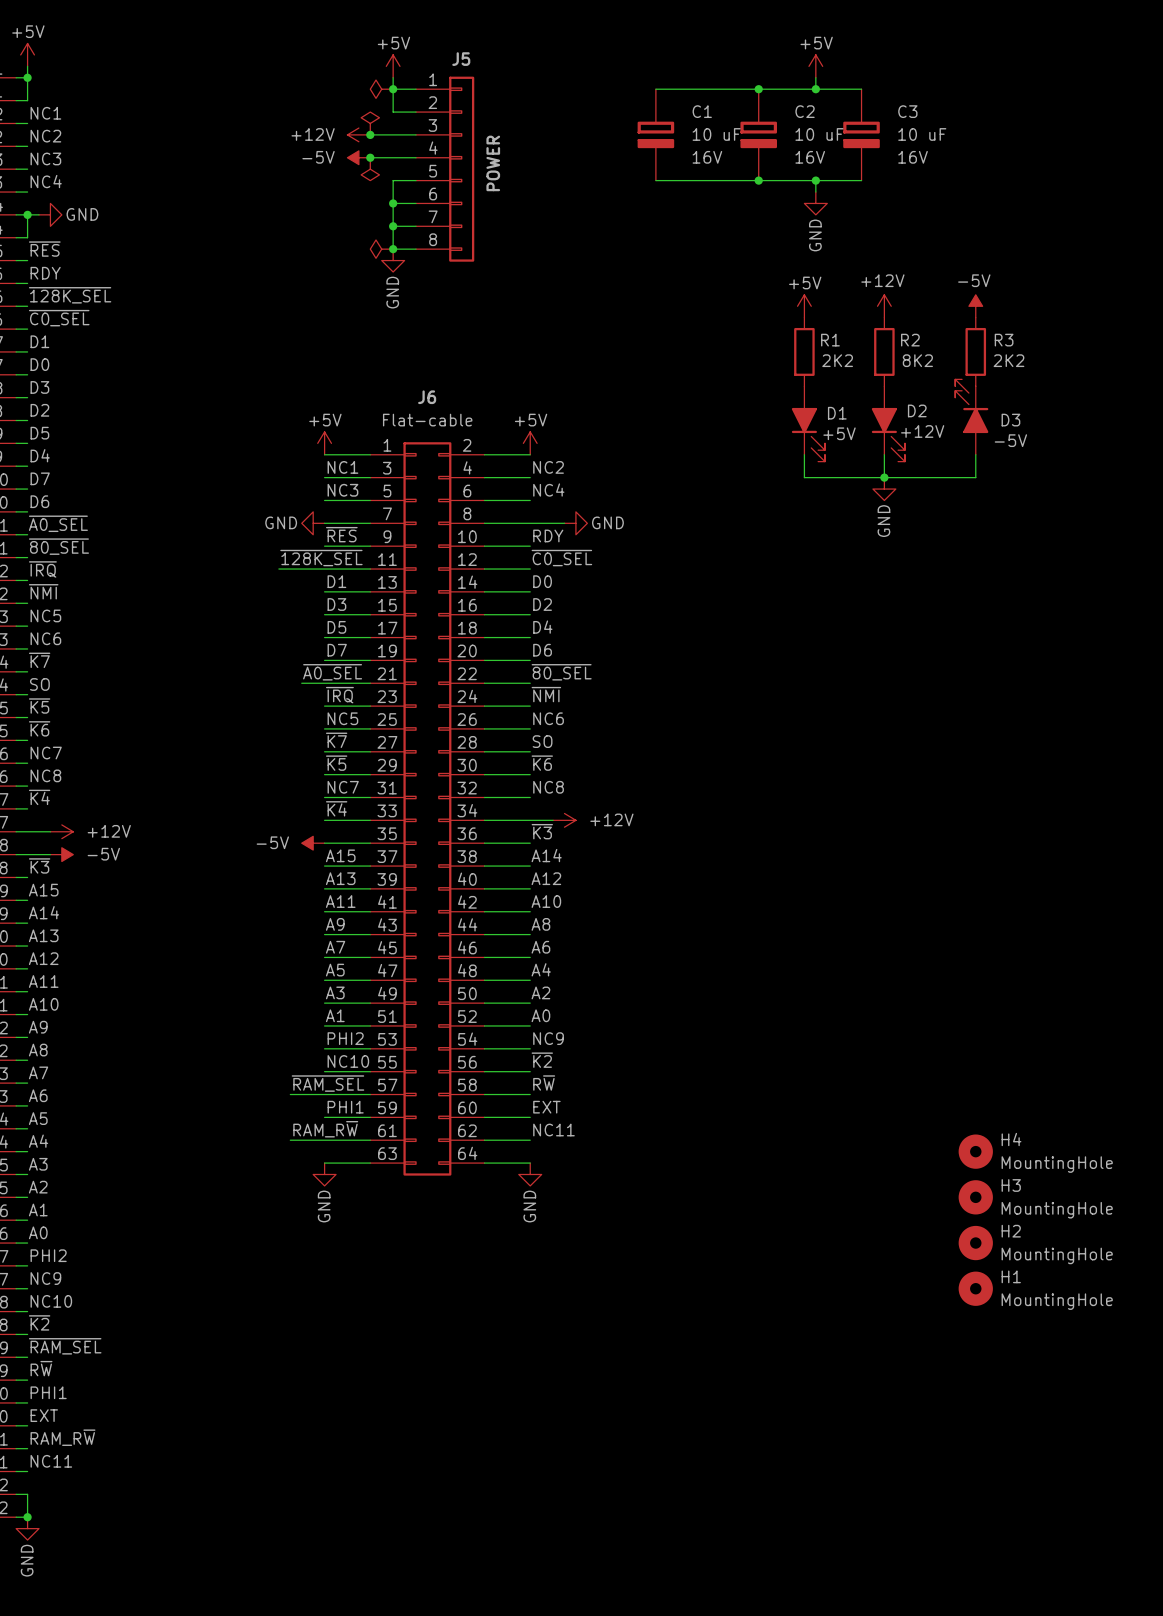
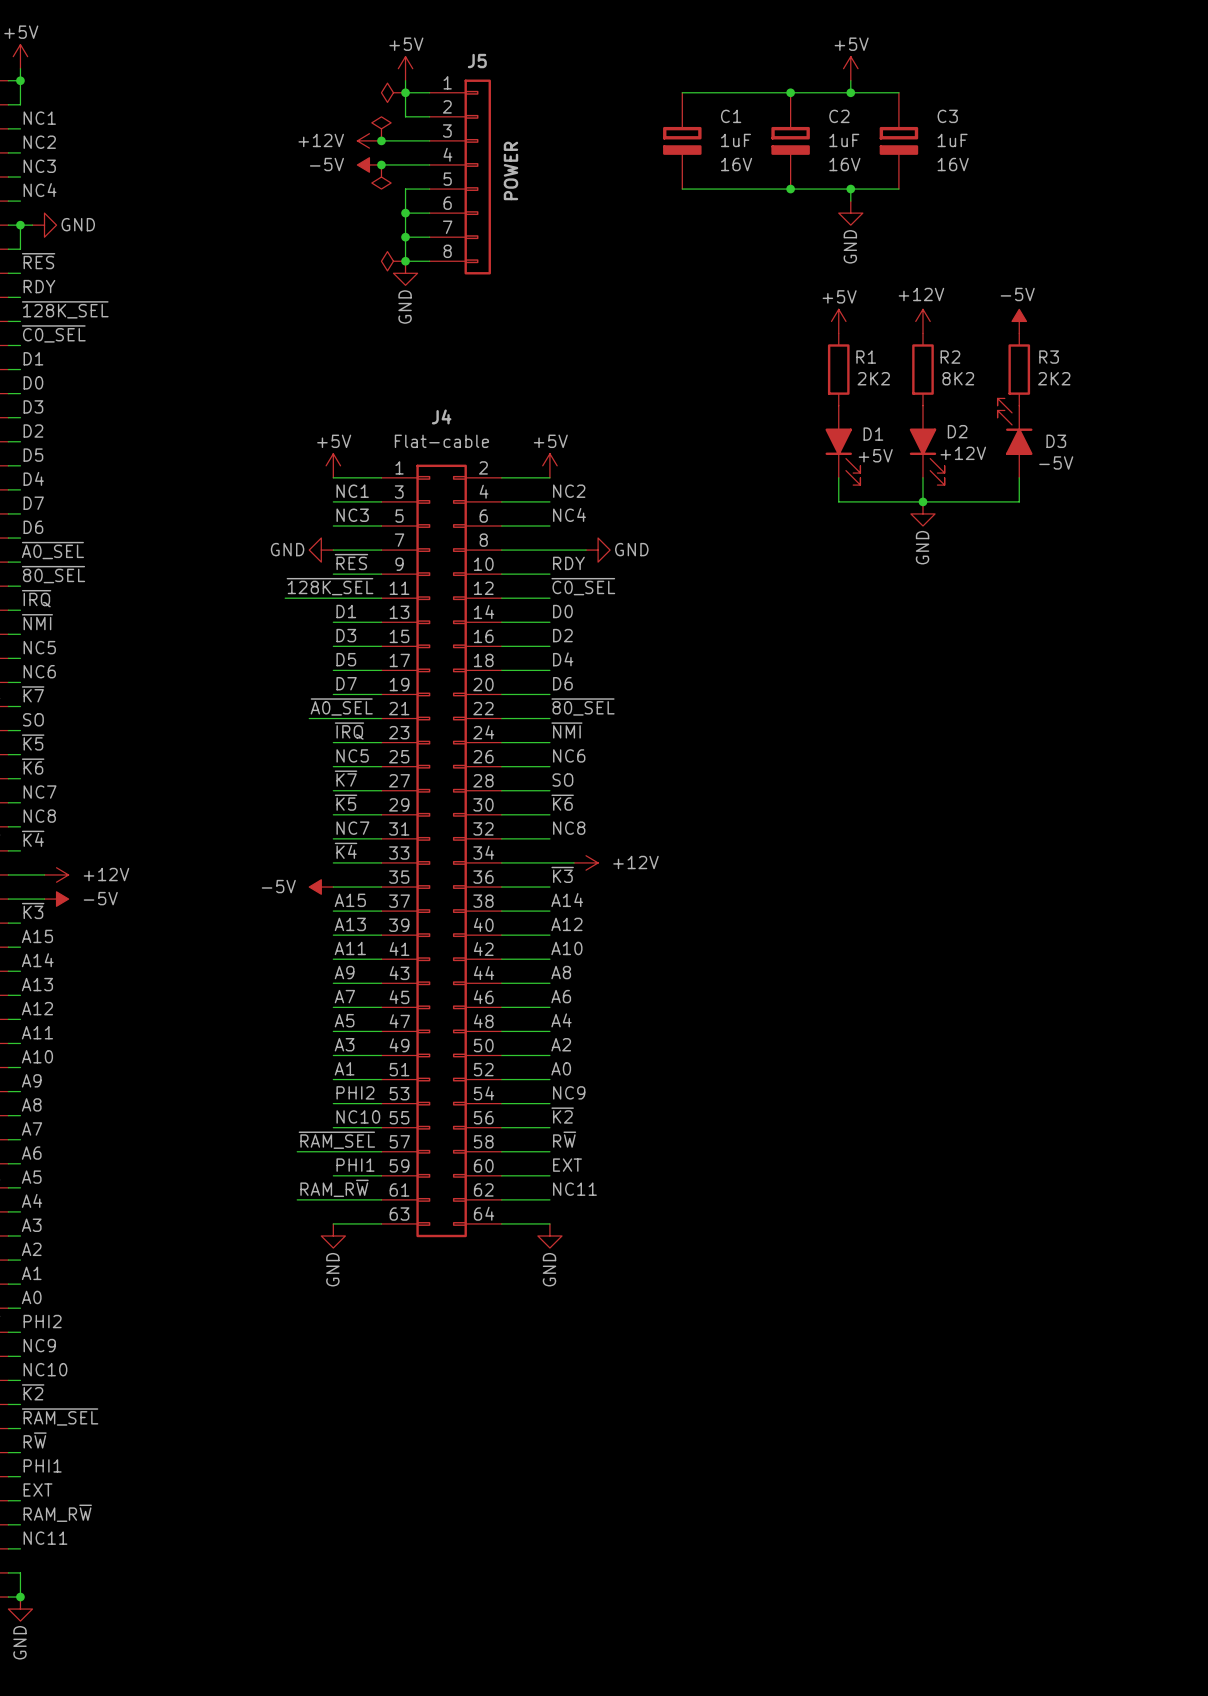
C1 value: 10 uF (716, 134) -> 1uF (735, 140)
C2 value: 10 uF (819, 134) -> 1uF (844, 140)
C3 value: 10 uF (922, 134) -> 1uF (952, 140)
J6 name: J6 (427, 397) -> J4 (441, 416)
H4: MountingHole (975, 1151) -> none
H3: MountingHole (975, 1197) -> none
H2: MountingHole (975, 1243) -> none
H1: MountingHole (975, 1288) -> none

